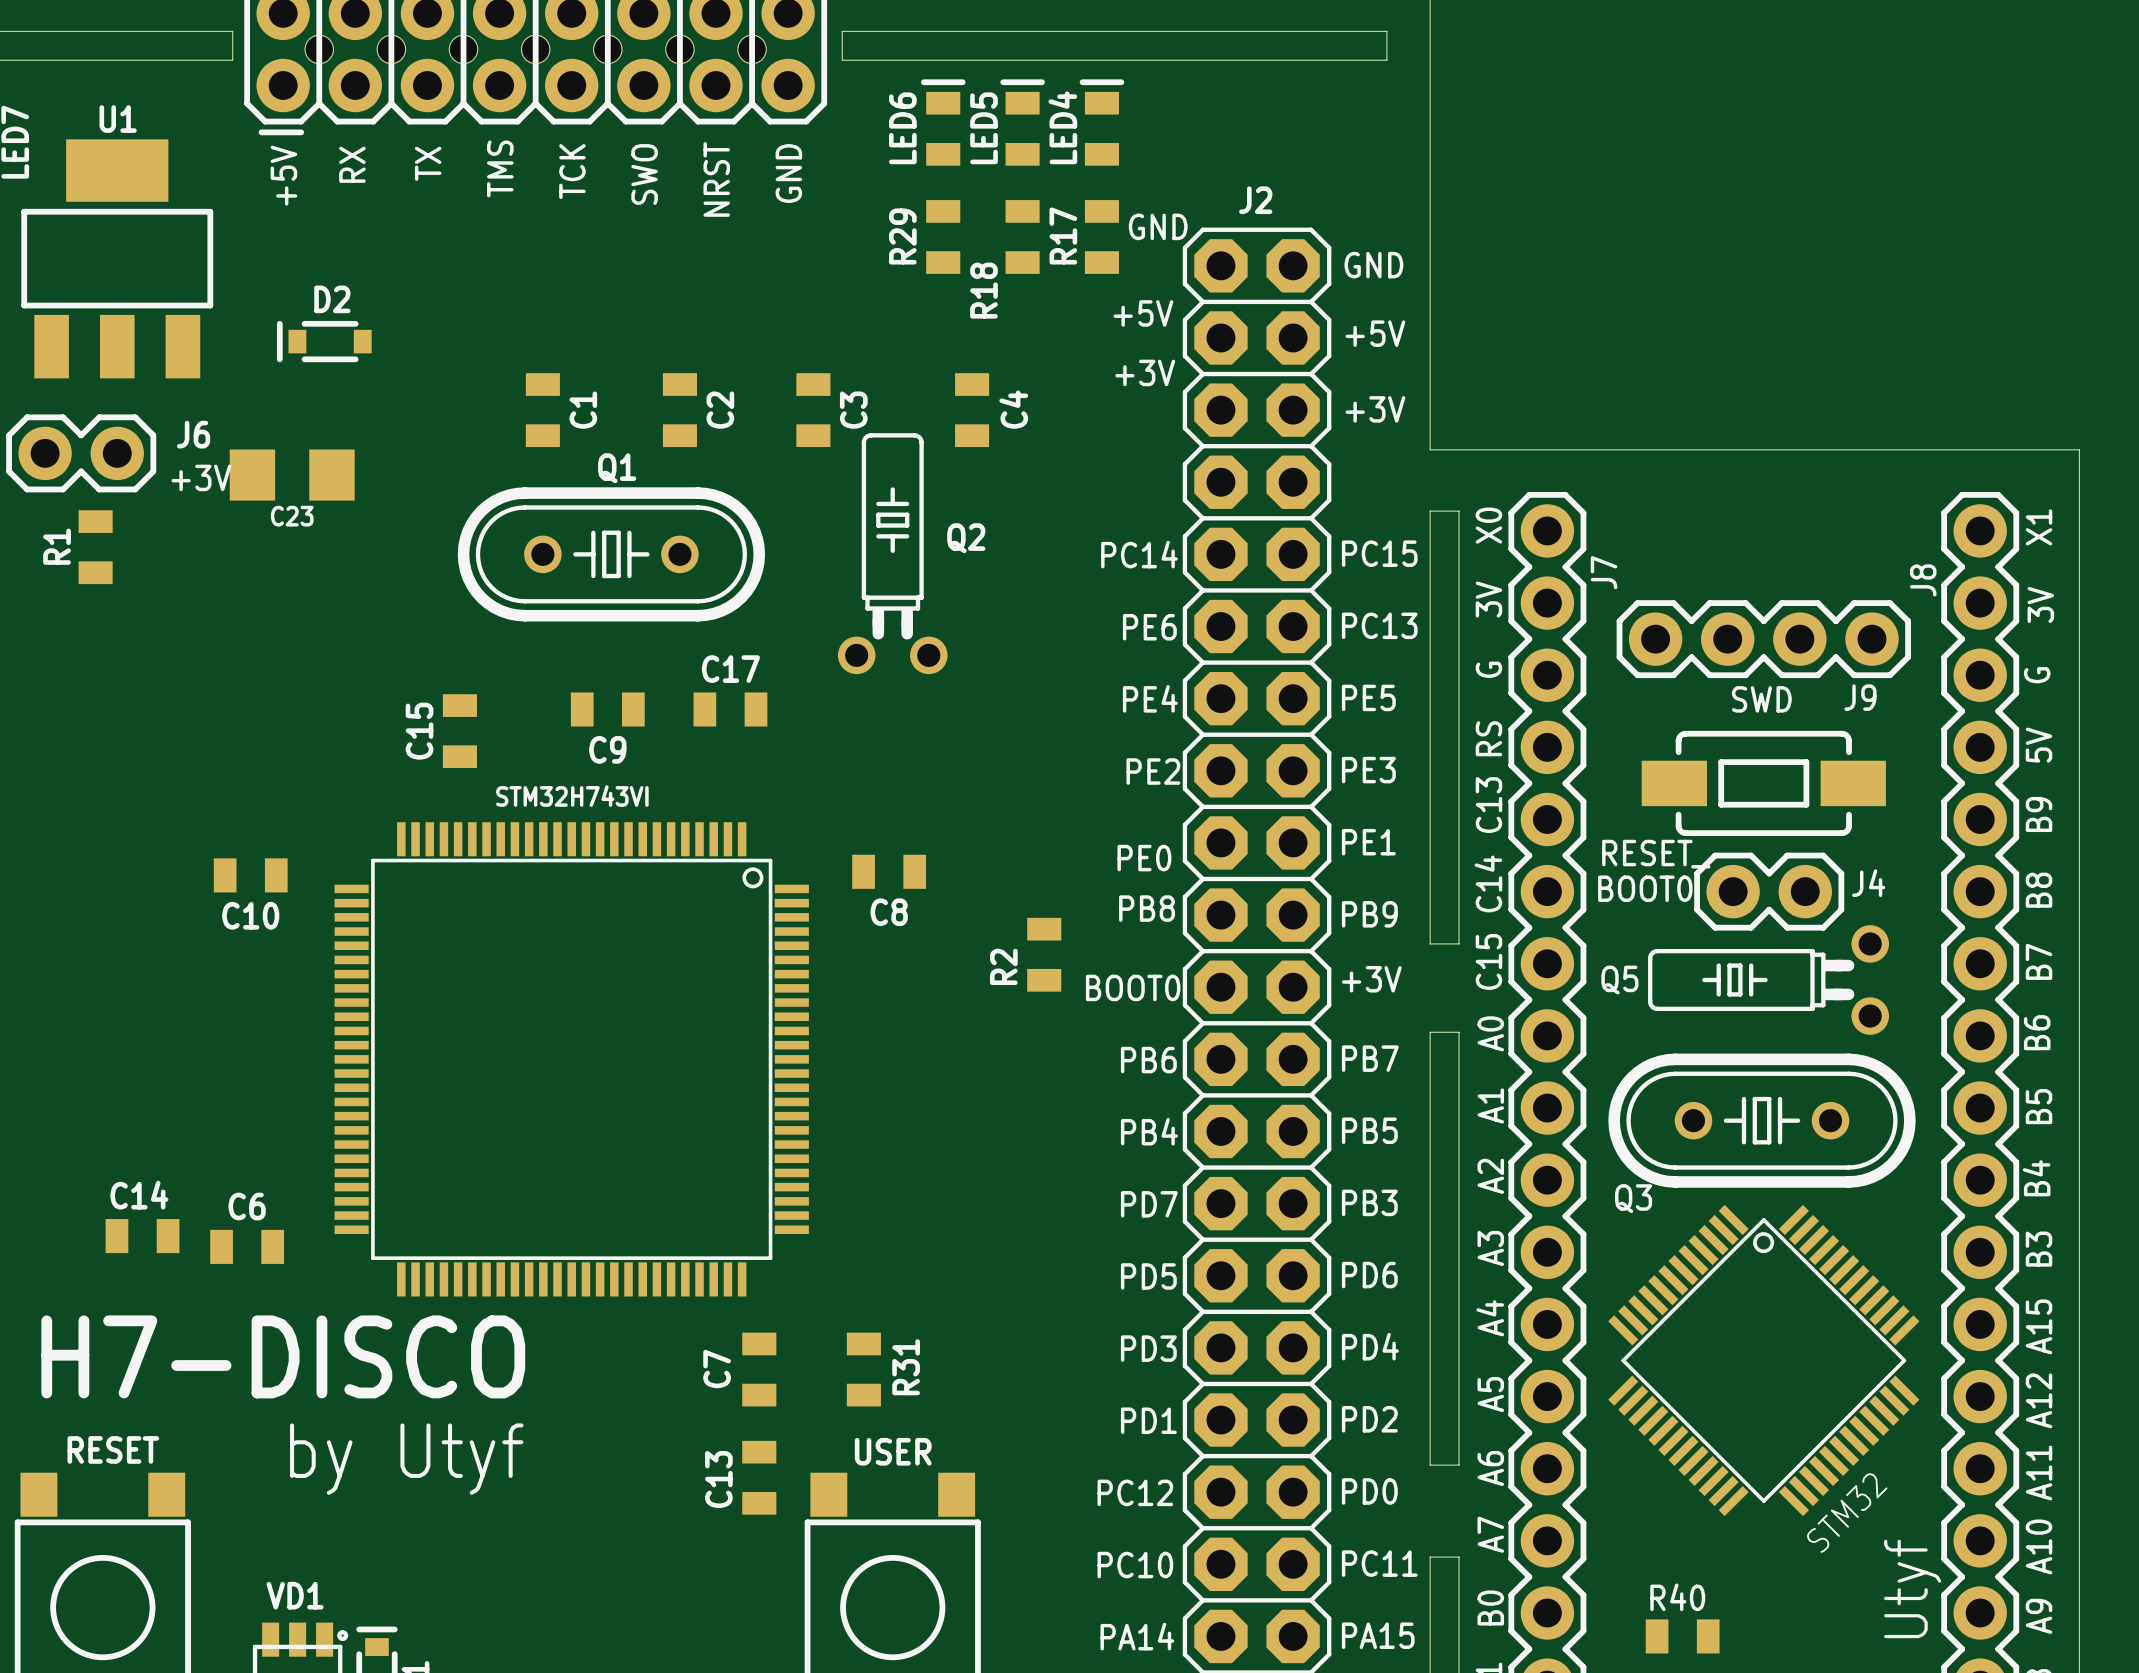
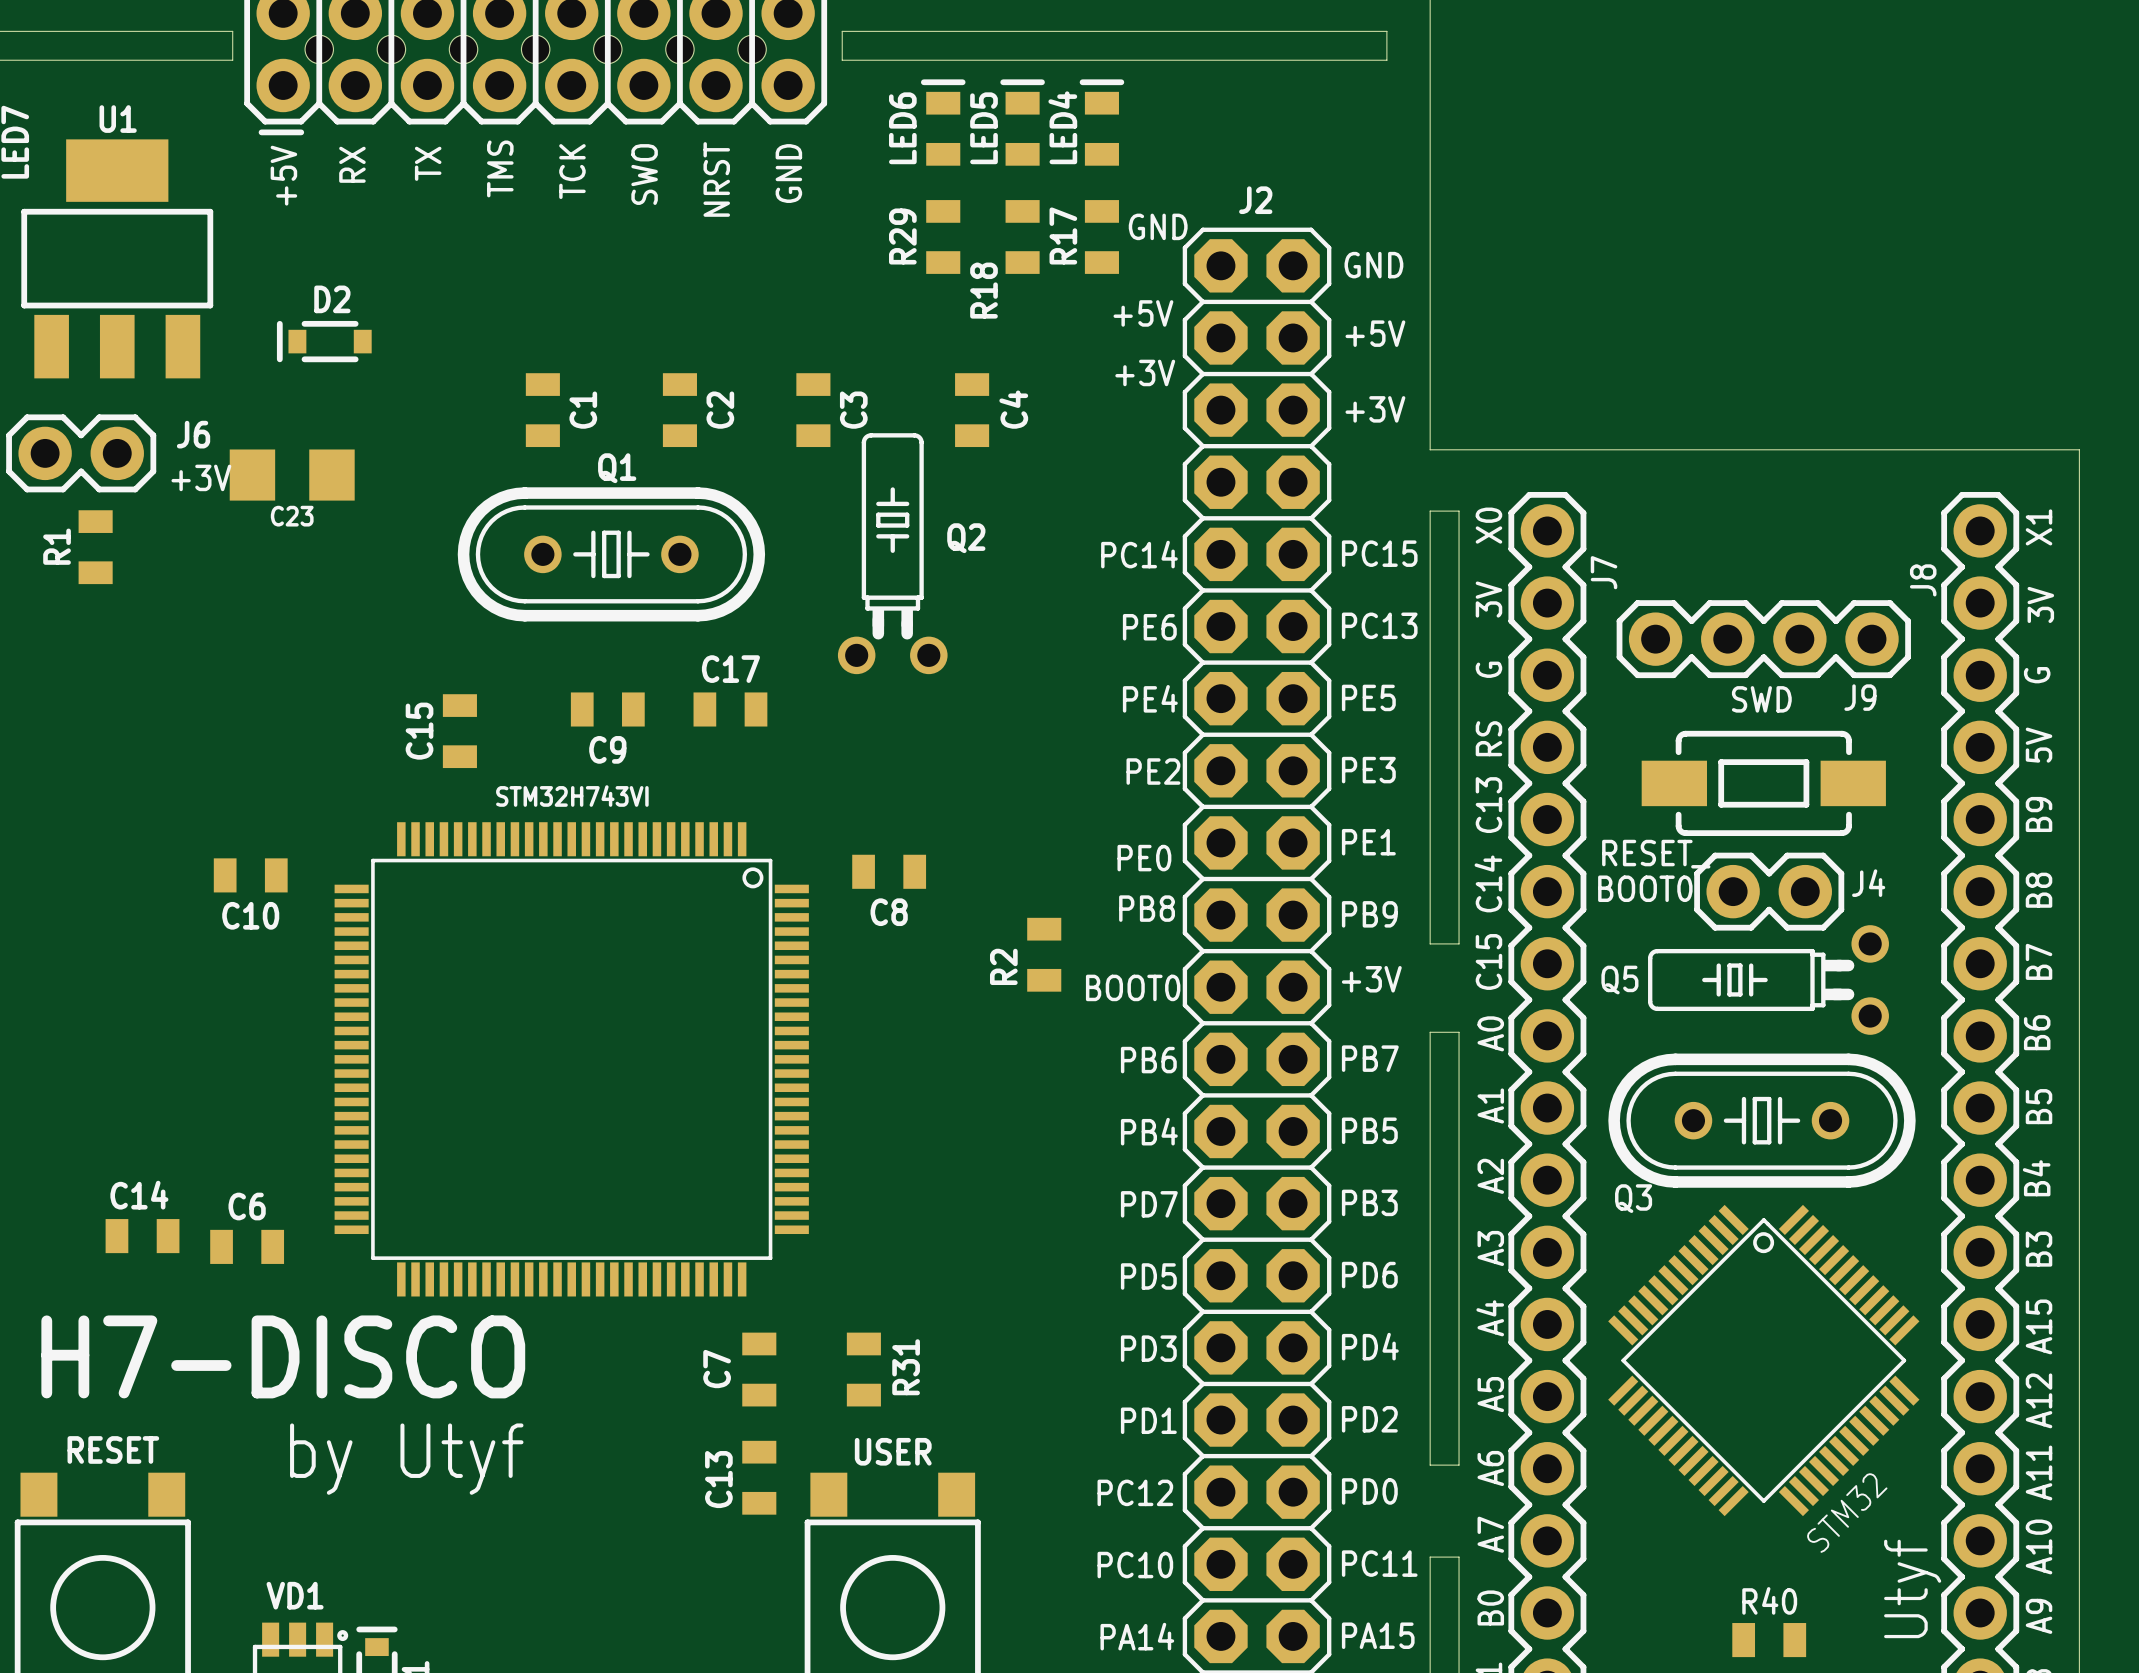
R40 name position: R40 (1677, 1597) -> R40 (1769, 1600)
R40 position: (1682, 1636) -> (1769, 1640)

